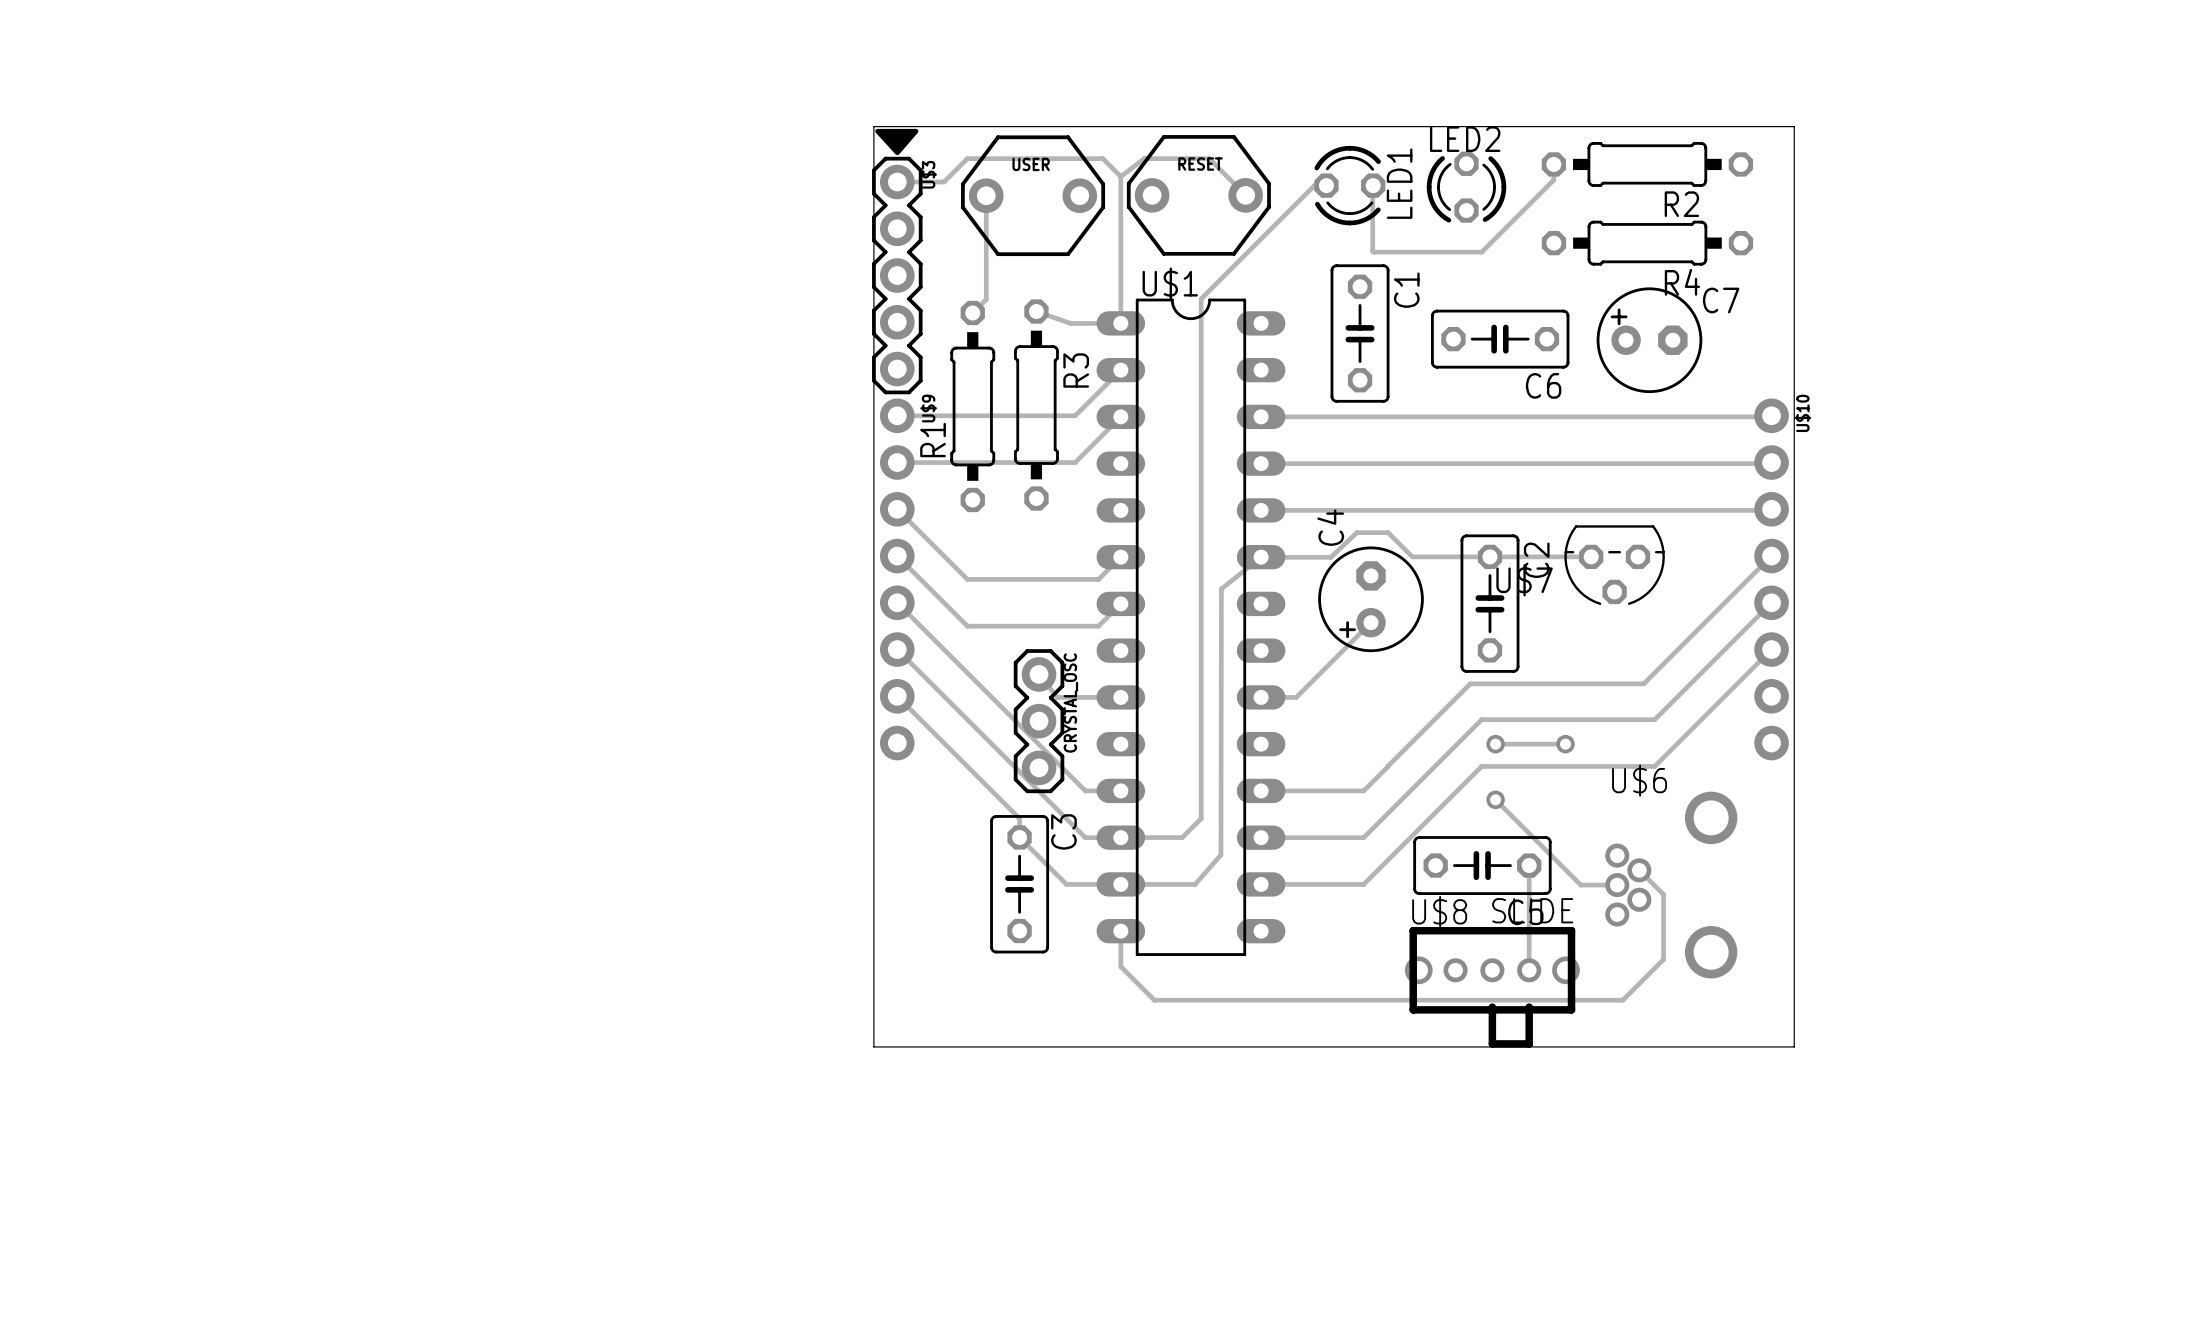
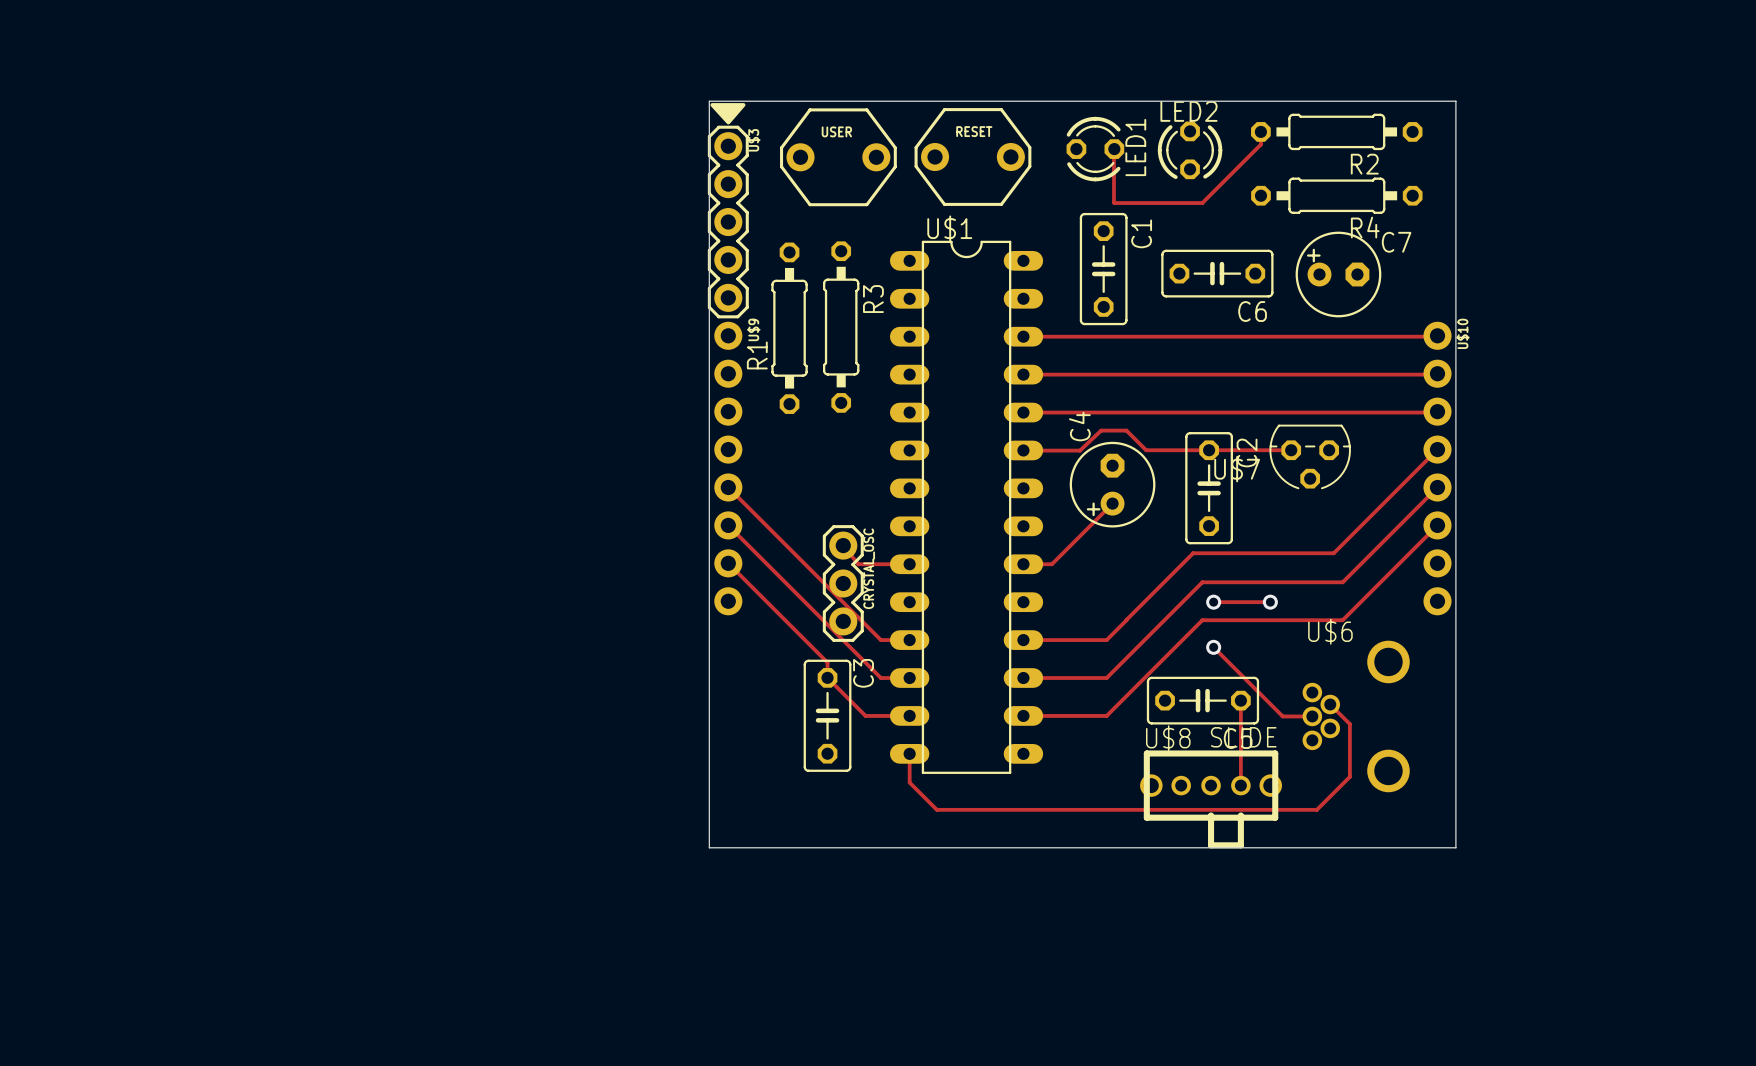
track: (1120, 176) (1120, 323) (1070, 323) (1036, 311) -> none
track: (1120, 176) (1144, 158) (1209, 158) (1245, 195) -> none
track: (1120, 176) (1102, 158) (967, 158) (944, 182) (897, 182) -> none
track: (1326, 185) (1314, 185) (1201, 298) (1201, 818) (1182, 837) (1120, 837) -> none
track: (986, 195) (986, 299) (972, 312) -> none
track: (1120, 370) (1075, 415) (897, 415) -> none
track: (1120, 416) (1075, 462) (897, 462) -> none
track: (897, 509) (967, 579) (1098, 579) (1120, 557) -> none
track: (897, 556) (967, 626) (1098, 626) (1120, 603) -> none
track: (1261, 557) (1221, 588) (1220, 854) (1195, 884) (1120, 884) -> none

